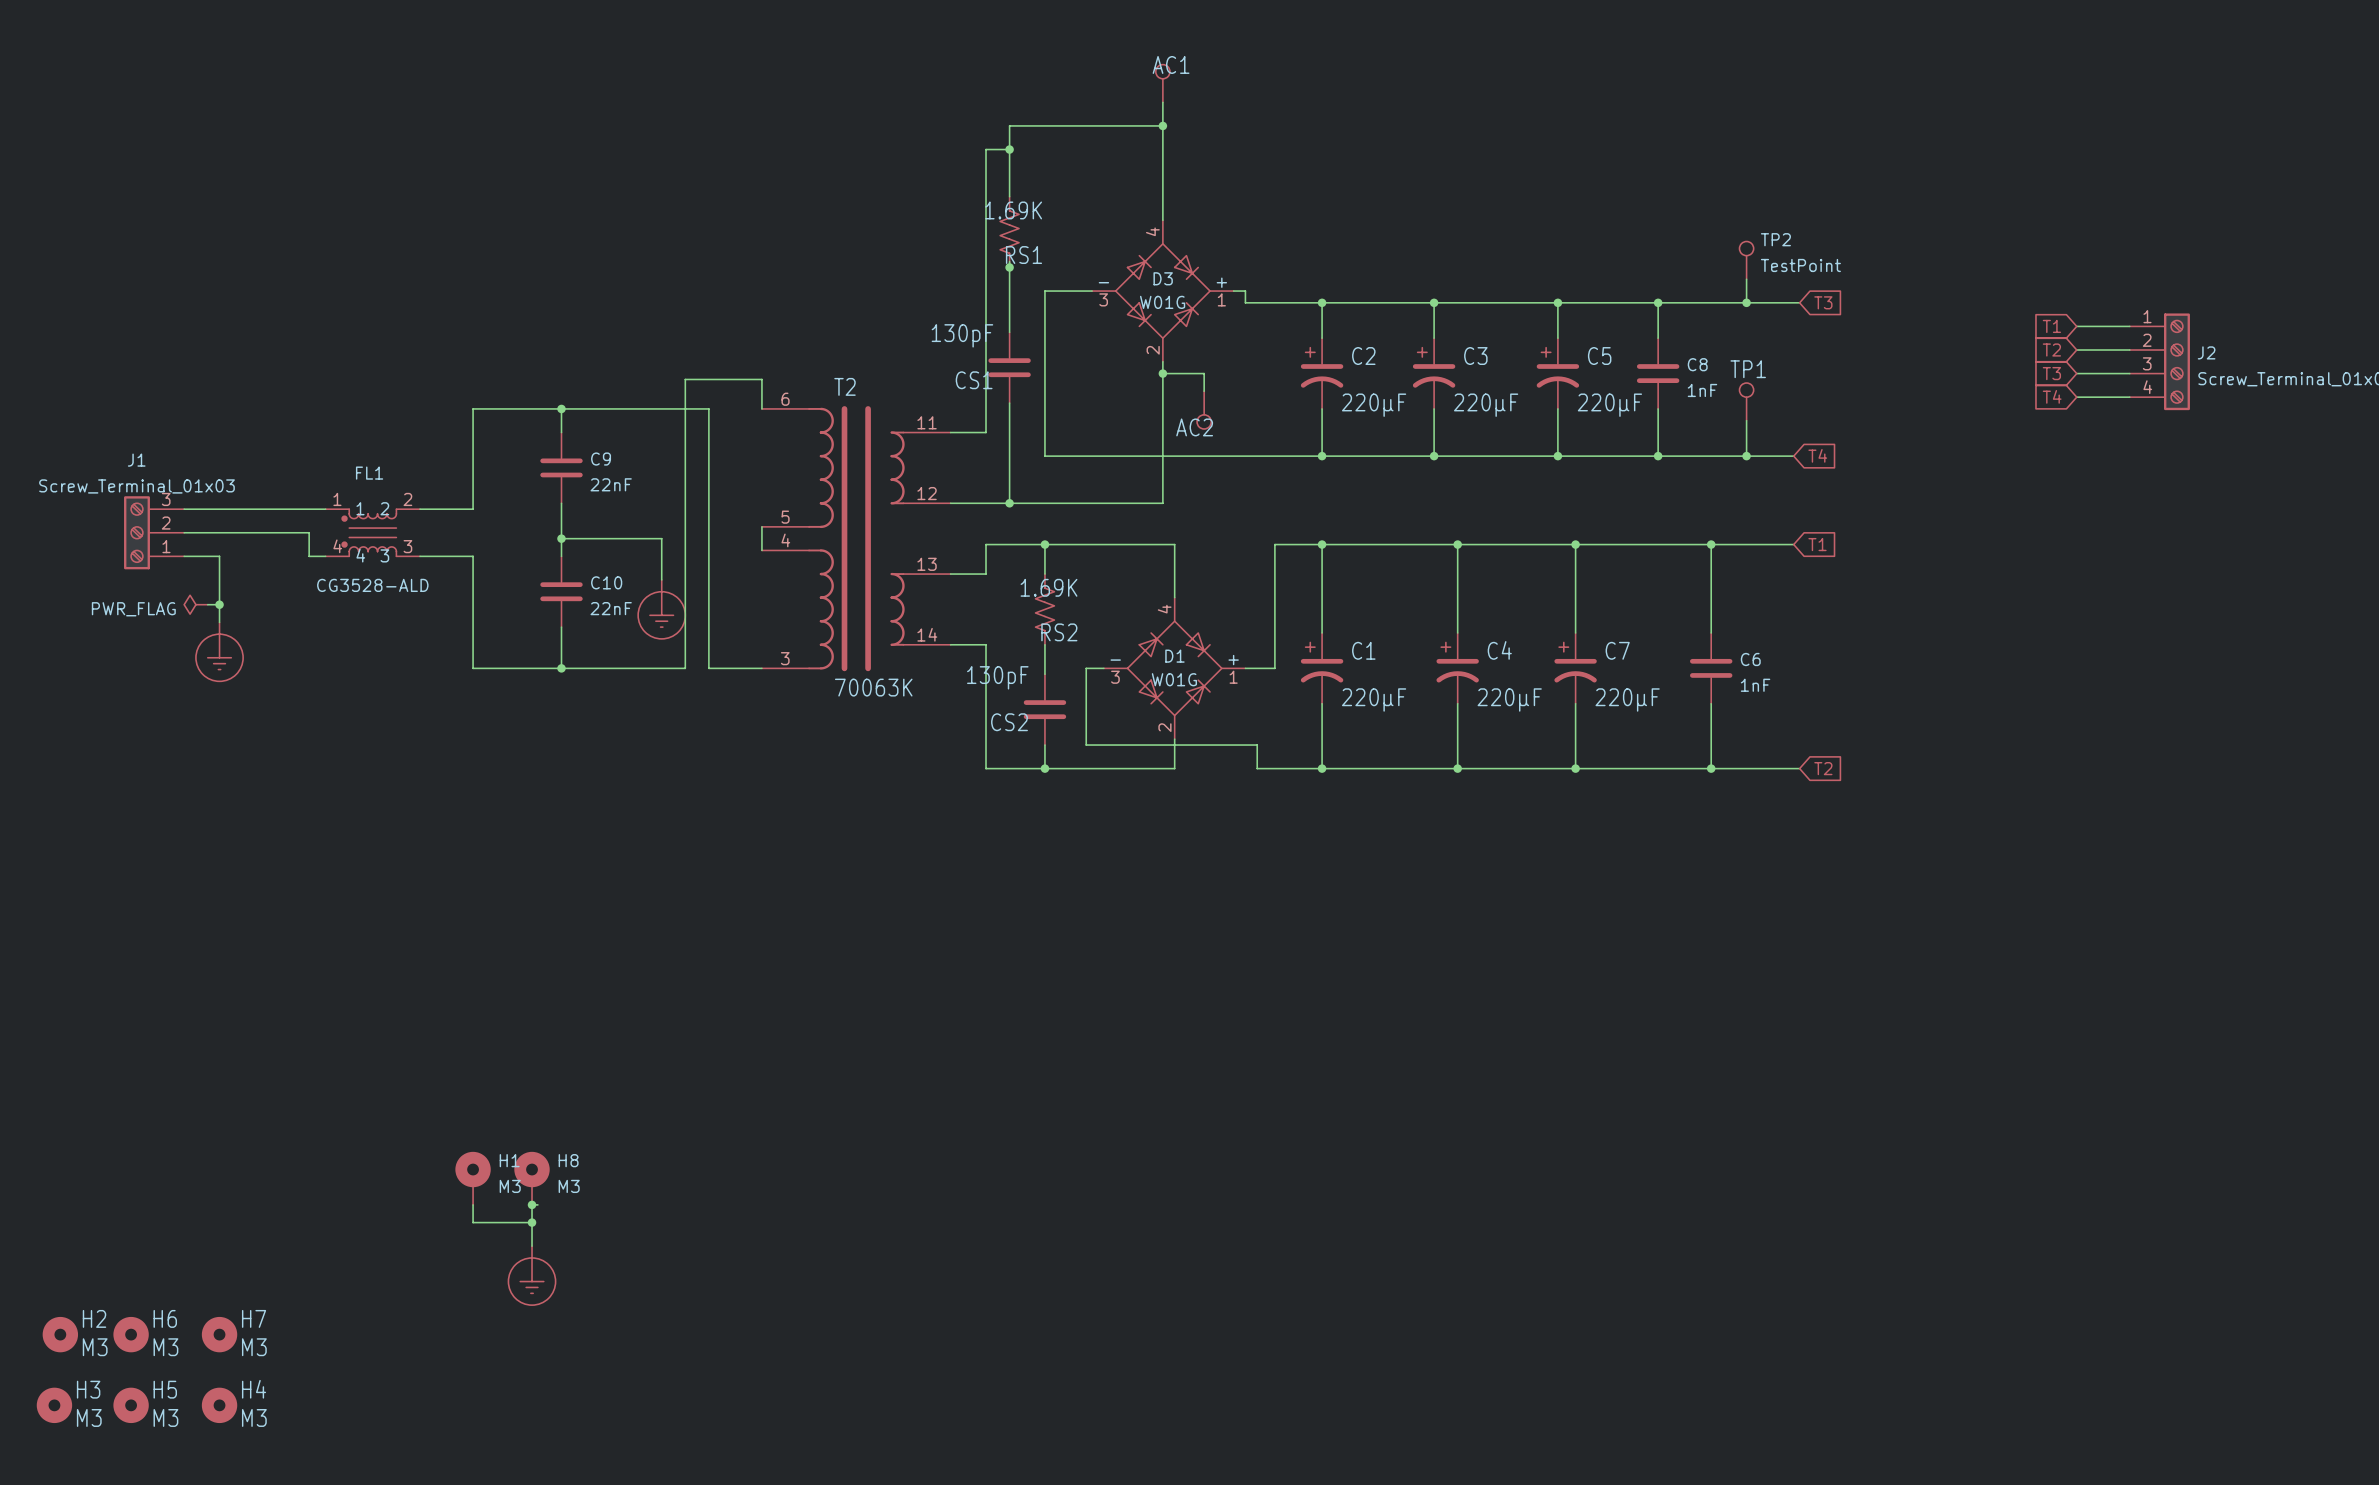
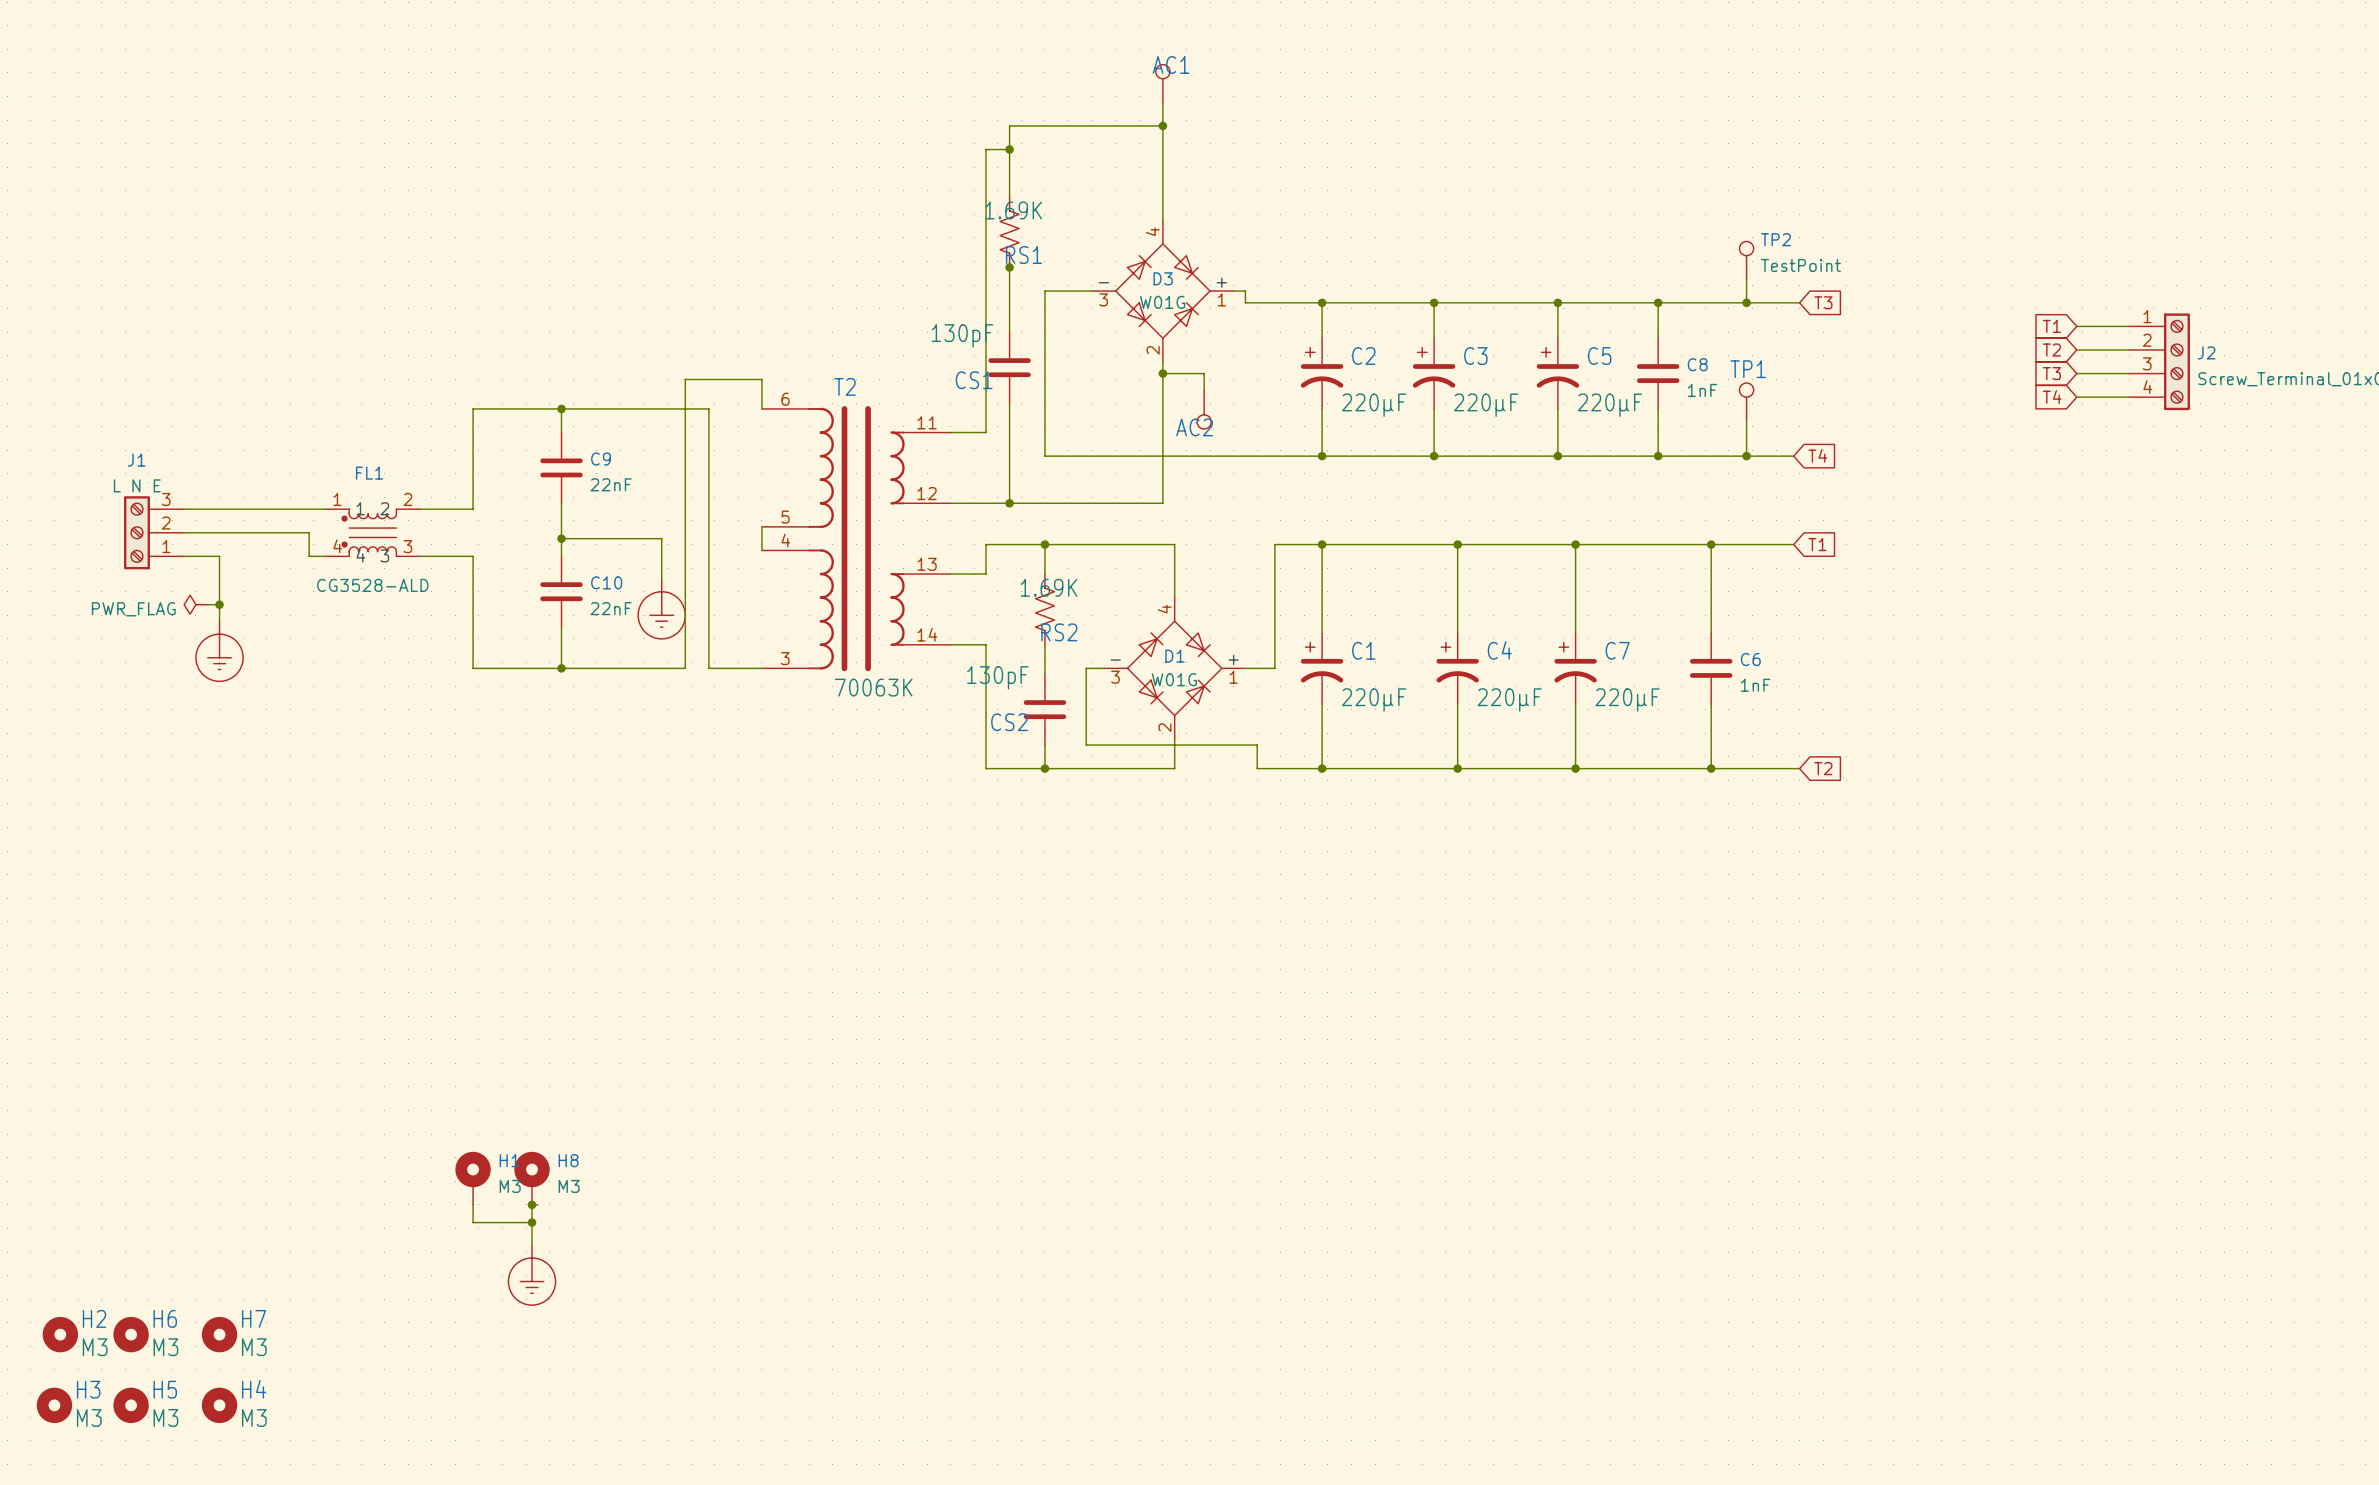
J1 value: Screw_Terminal_01x03 (136, 486) -> L N E (137, 485)

